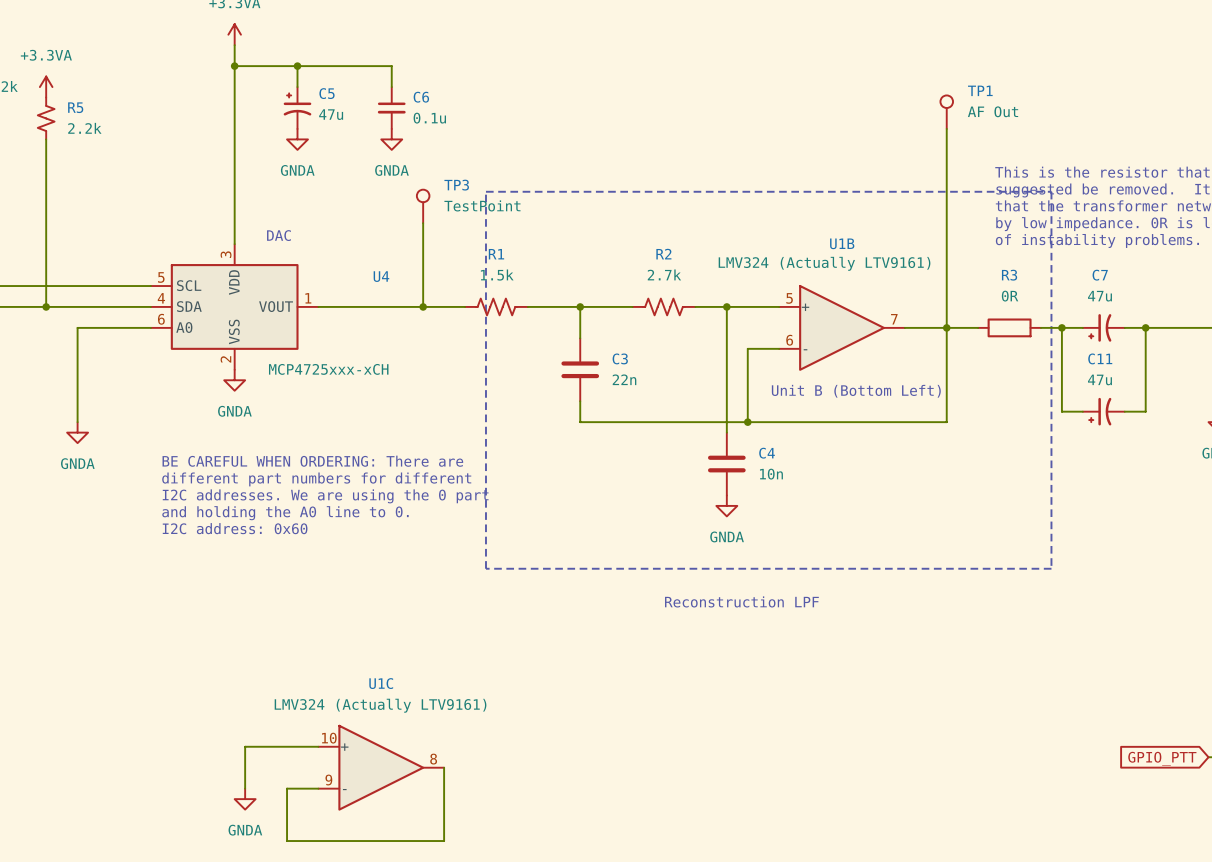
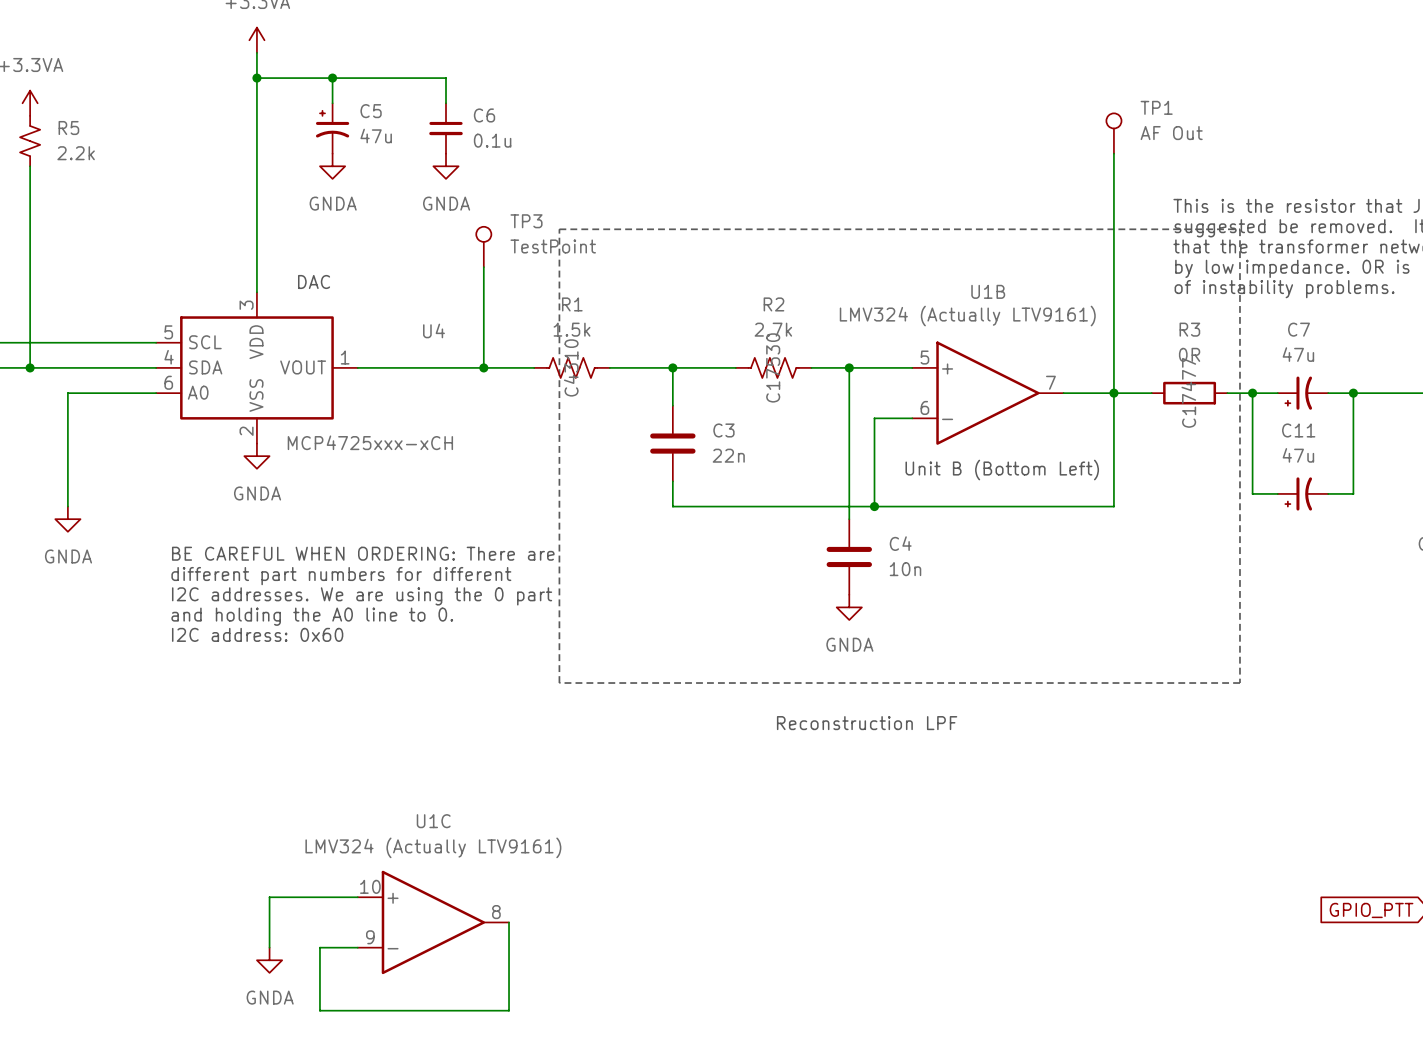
R1 text: none -> C4310 (571, 367)
R2 text: none -> C17530 (773, 367)
R3 text: none -> C17477 (1188, 392)

